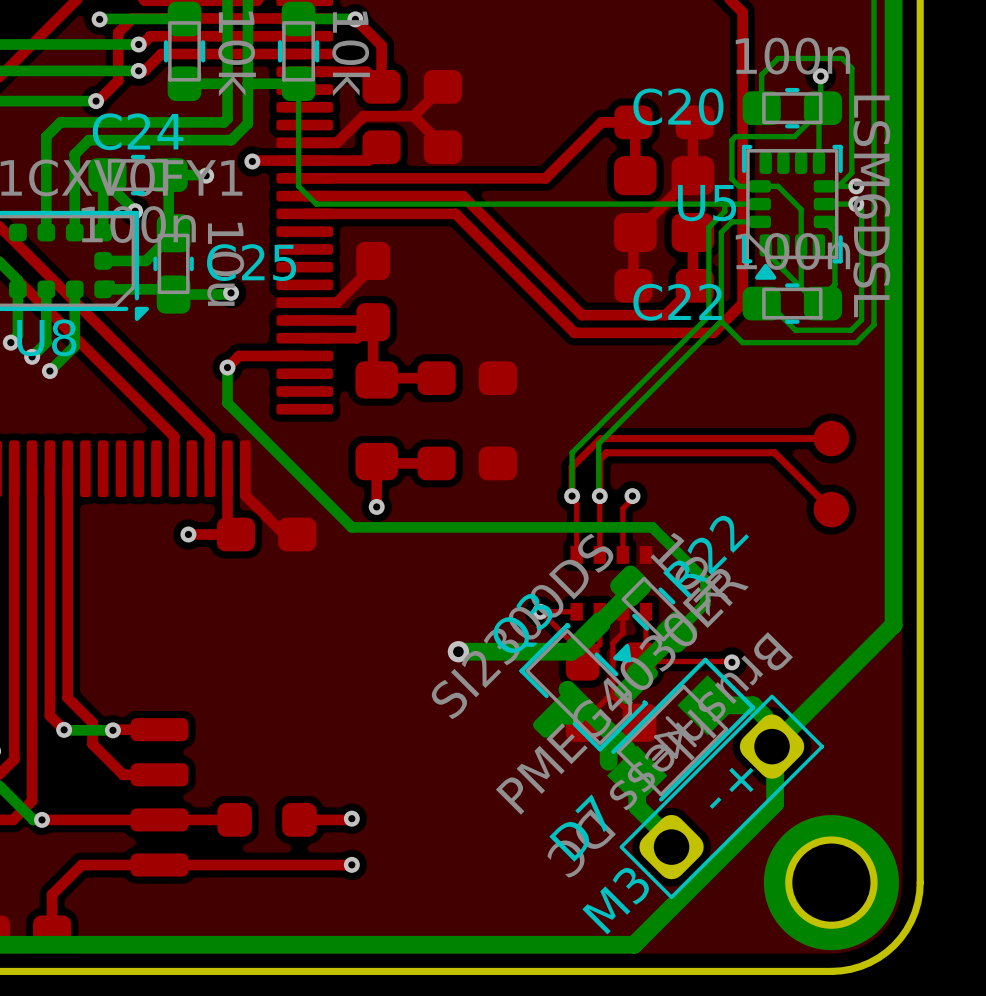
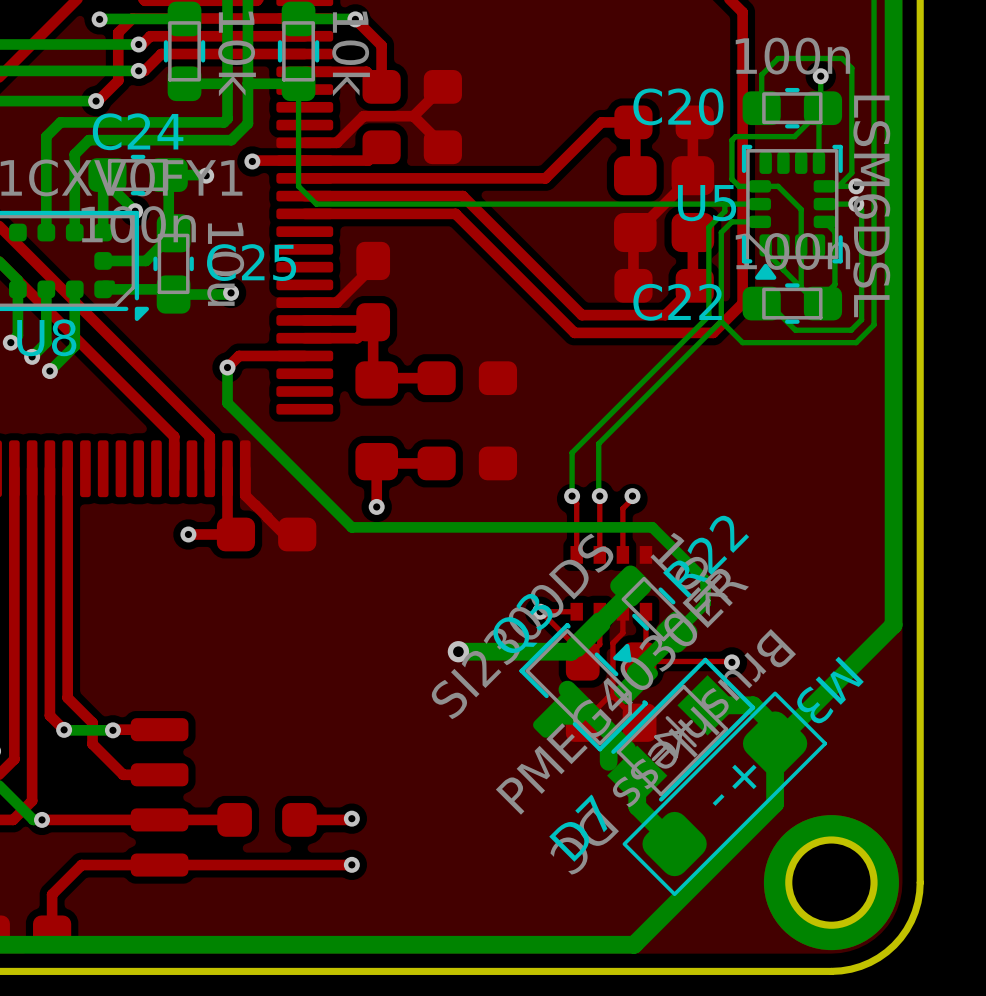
top track: (831, 438) (600, 438) (572, 466) (572, 496) -> none
part: (831, 438) -> none
top track: (599, 496) (599, 459) (606, 452) (774, 452) (831, 509) -> none
part: (831, 509) -> none
M3 footprint: [619, 694, 825, 900] -> [622, 691, 828, 897]
M3 name position: M3 (615, 900) -> M3 (830, 690)

